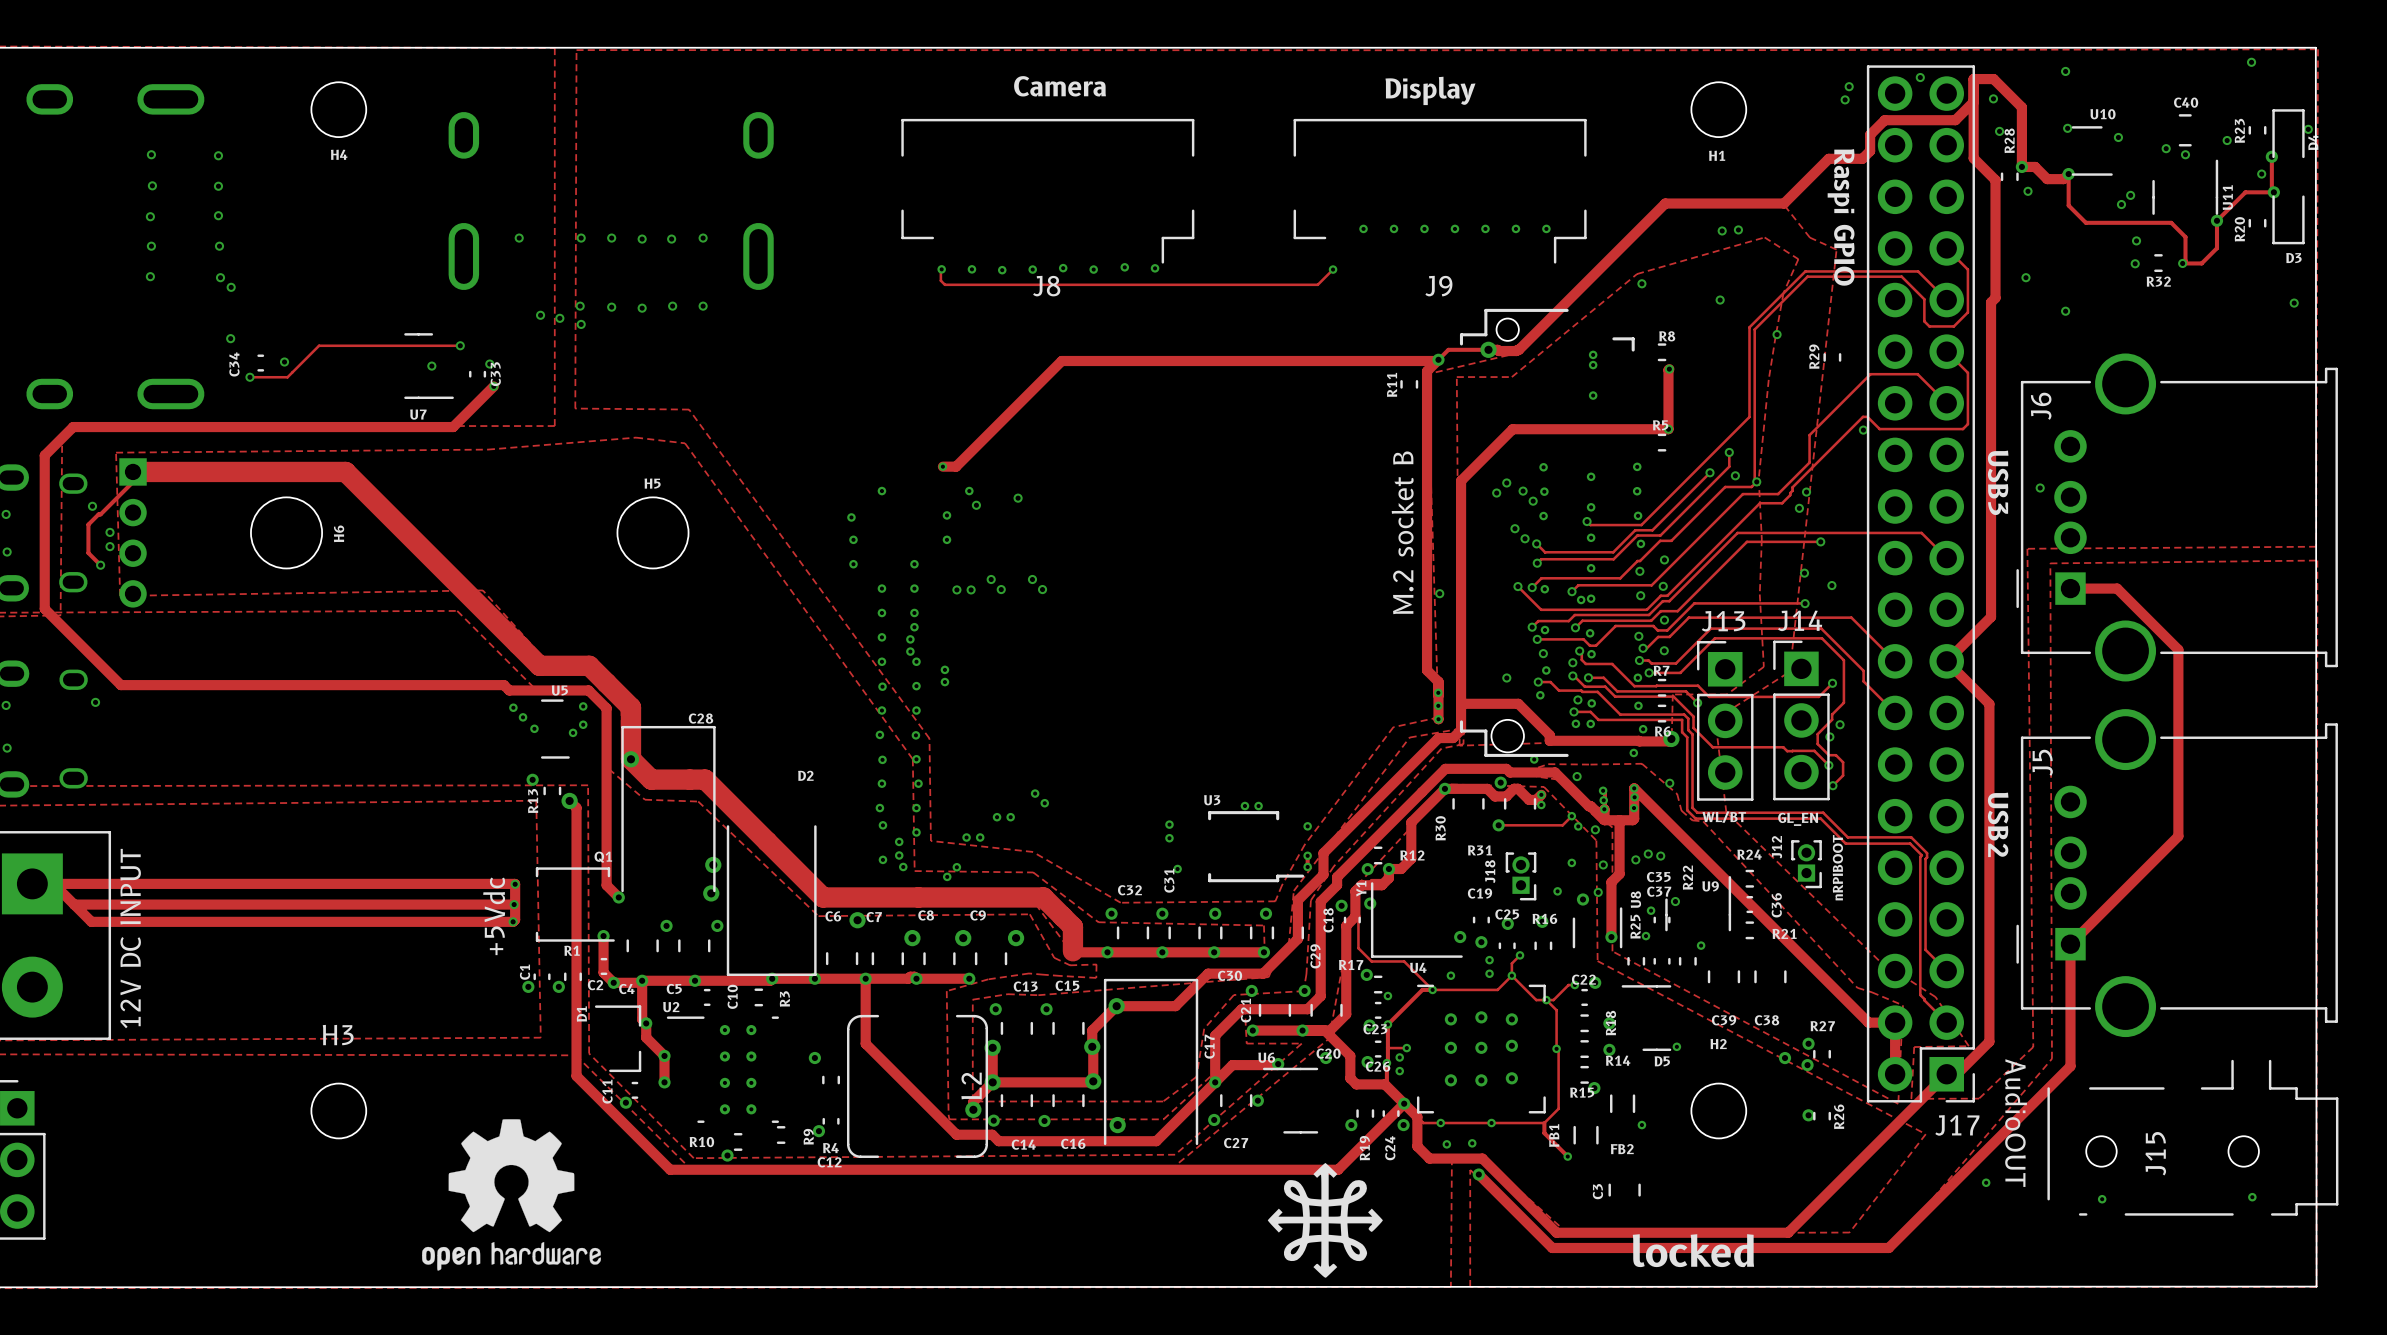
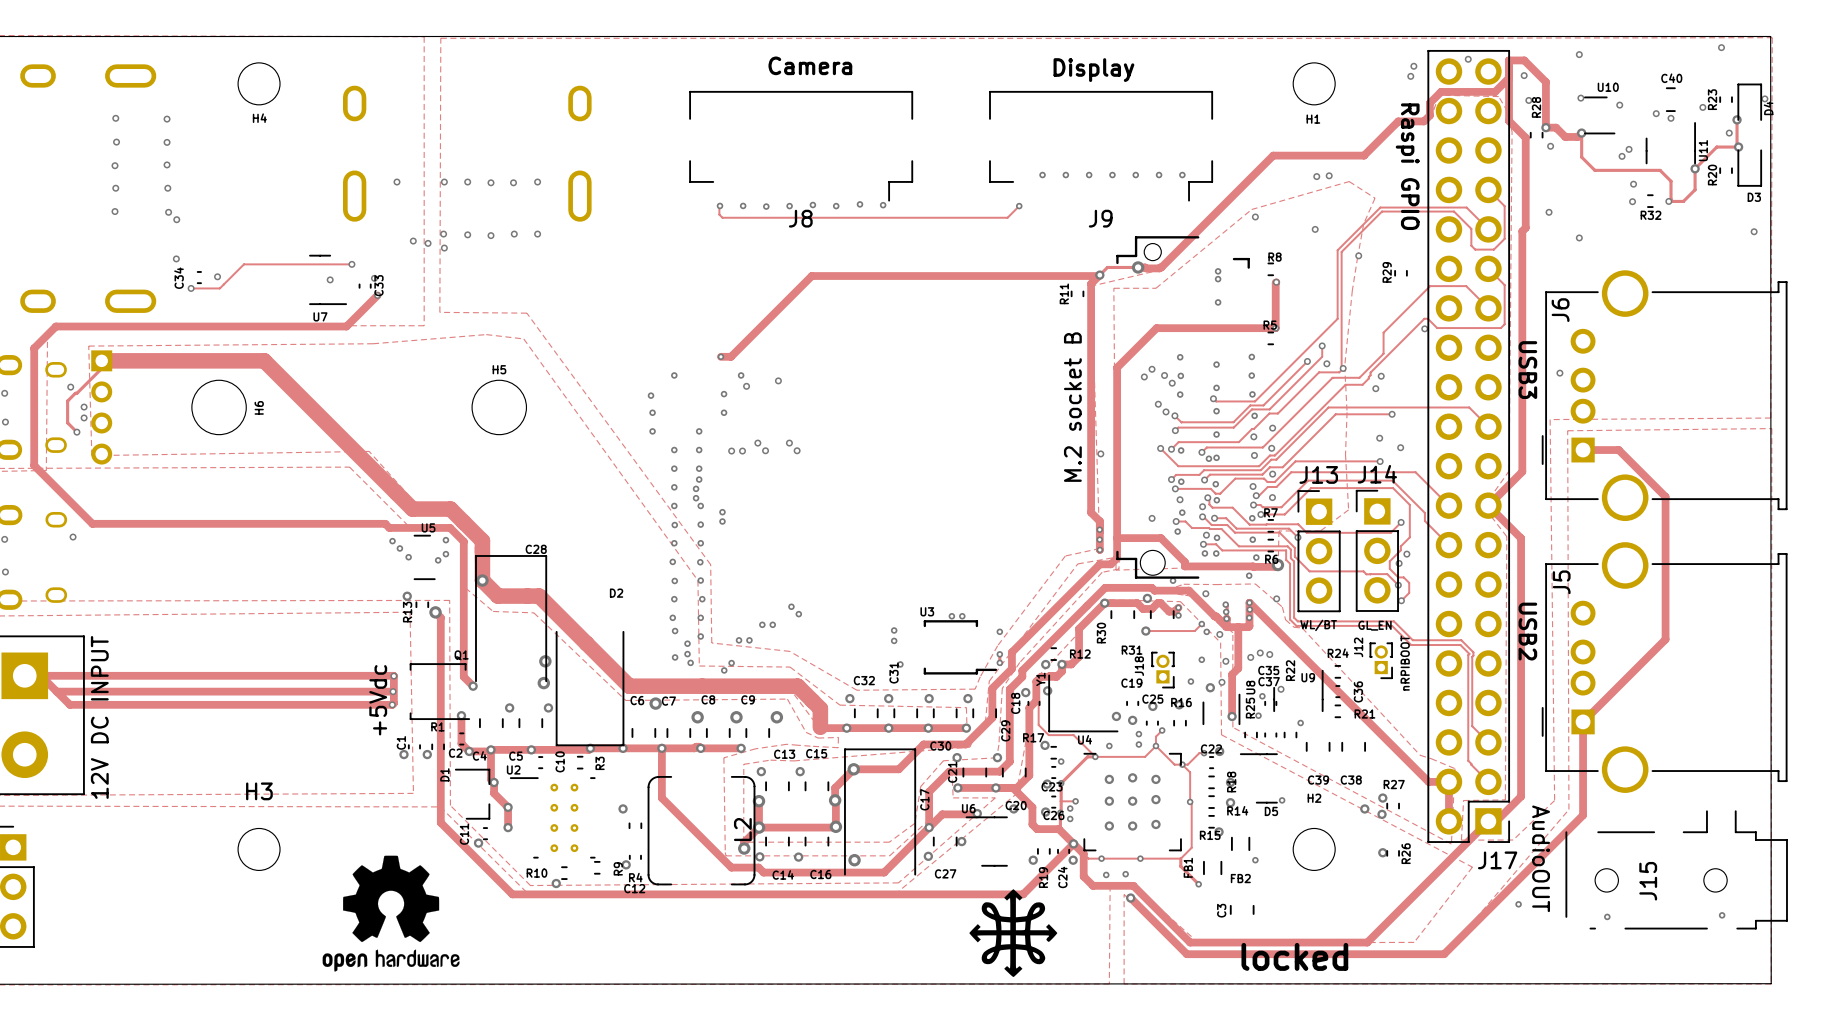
zone outline: (1783, 204) (1809, 237) (1836, 249) (1789, 671) (1715, 719) (1726, 812) (1878, 960) (1935, 997) (1968, 1046) -> (1363, 156) (1400, 124) (1430, 120) (1439, 95) (1498, 96) (1507, 111) (1512, 131) (1509, 471) (1483, 506) (1506, 536) (1505, 799)

